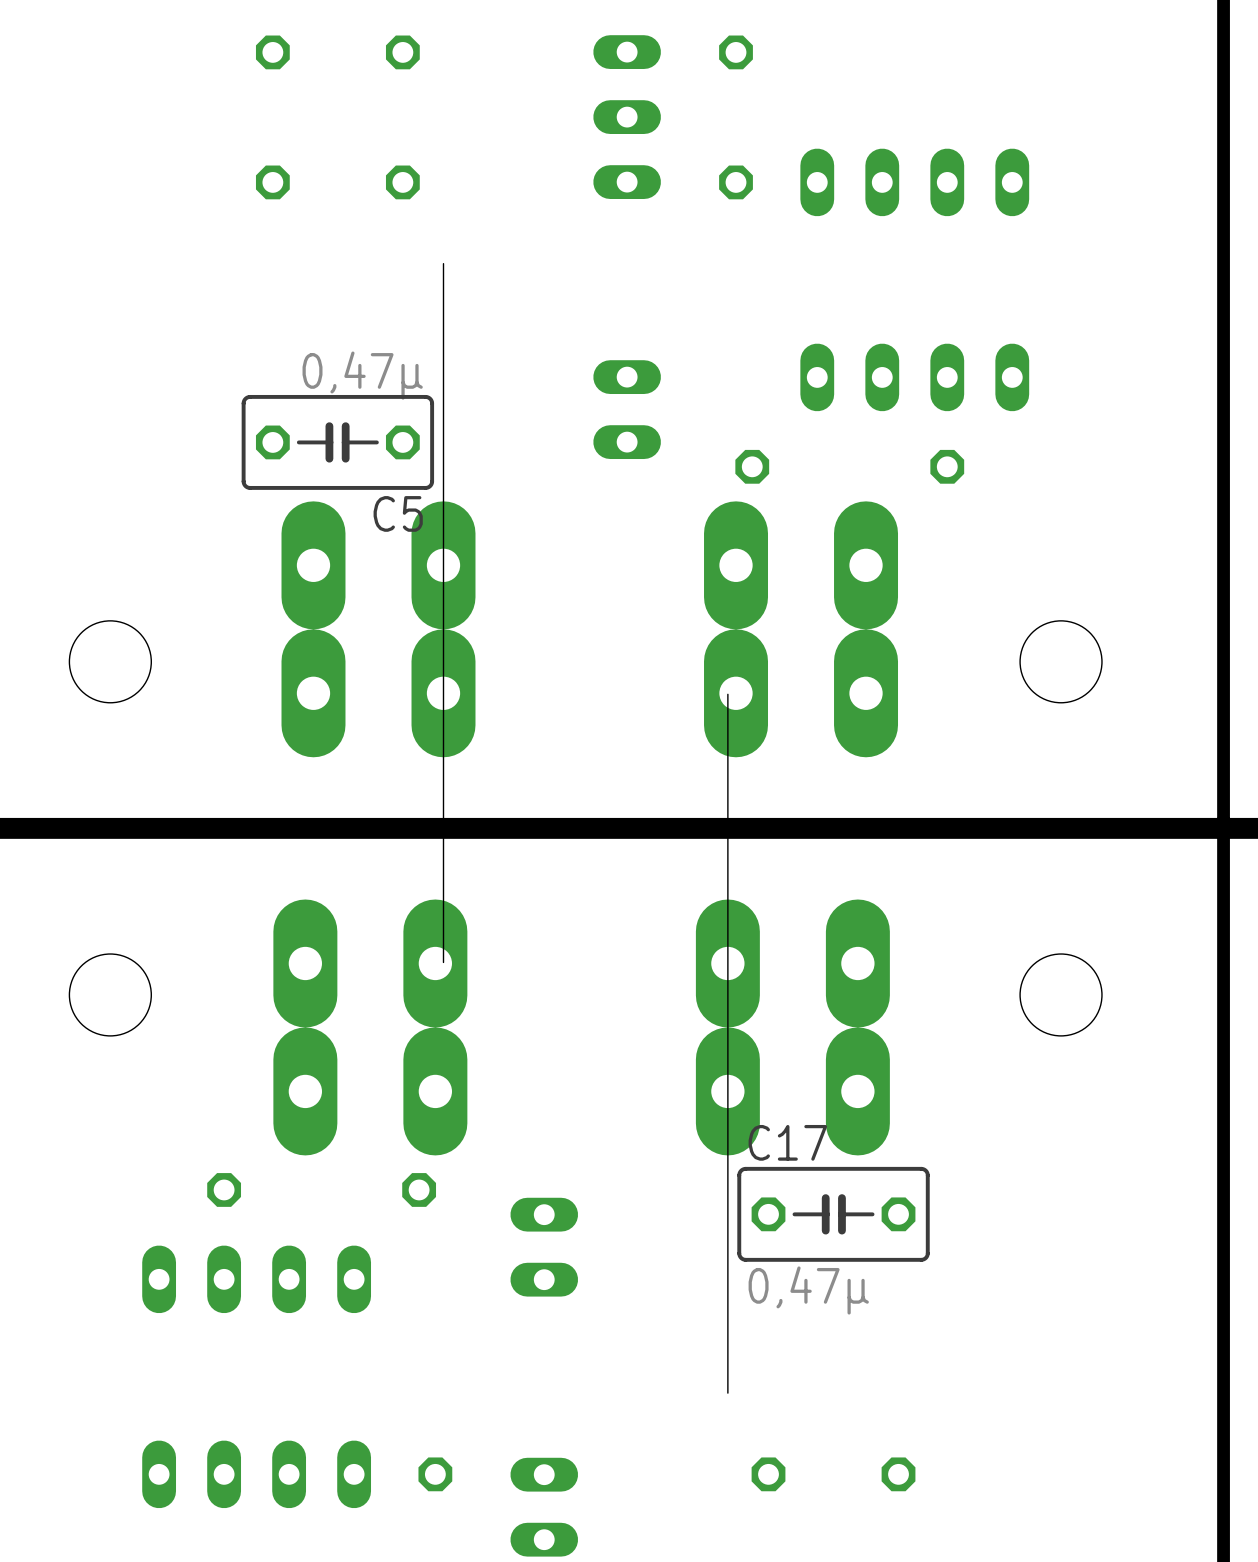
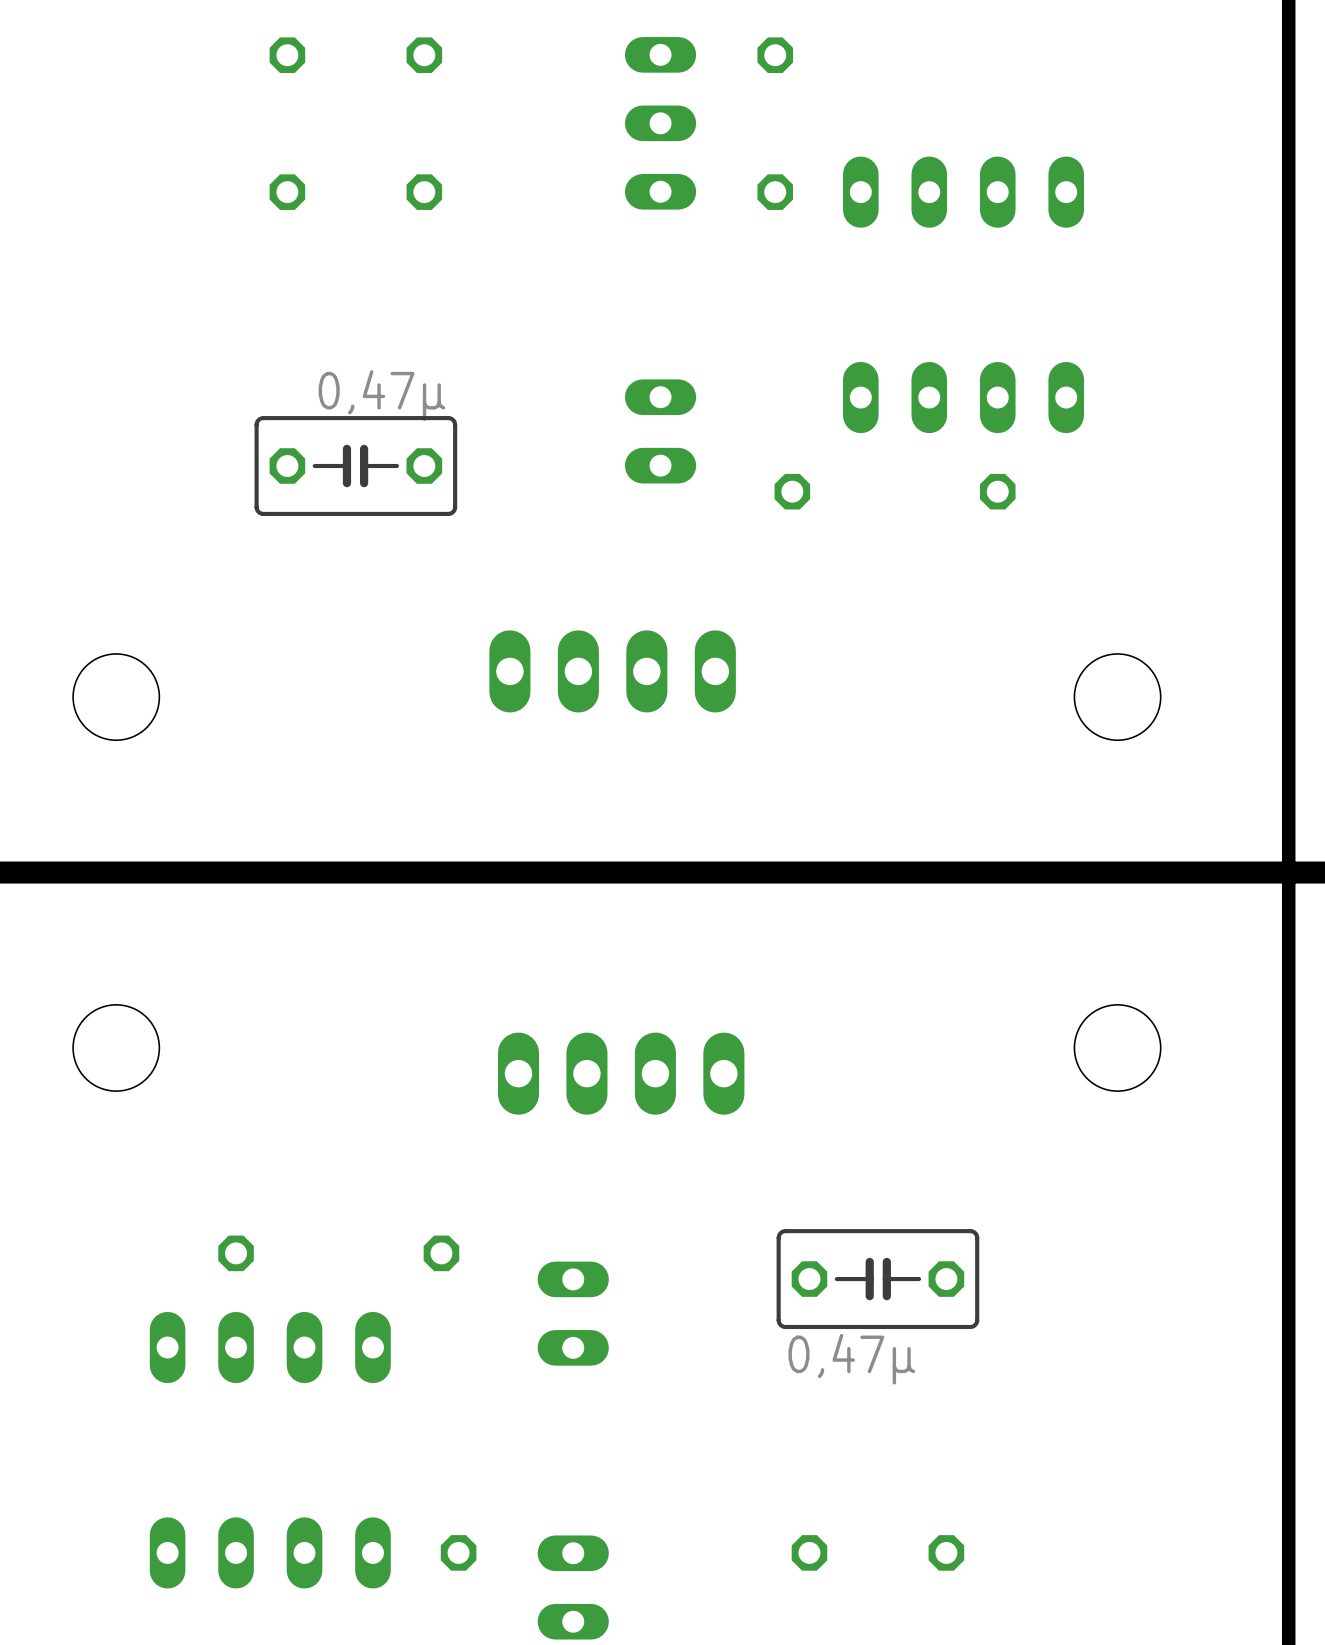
board edge: (443, 263) (443, 962) -> none
C5 name: C5 (398, 513) -> none
part: (313, 629) -> none
part: (443, 629) -> none
part: (736, 629) -> none
part: (866, 629) -> none
part: none -> (612, 671)
board edge: (727, 694) (727, 1393) -> none
part: none -> (621, 1073)
part: (305, 1027) -> none
part: (435, 1027) -> none
part: (727, 1027) -> none
part: (857, 1027) -> none
C17 name: C17 (787, 1142) -> none

